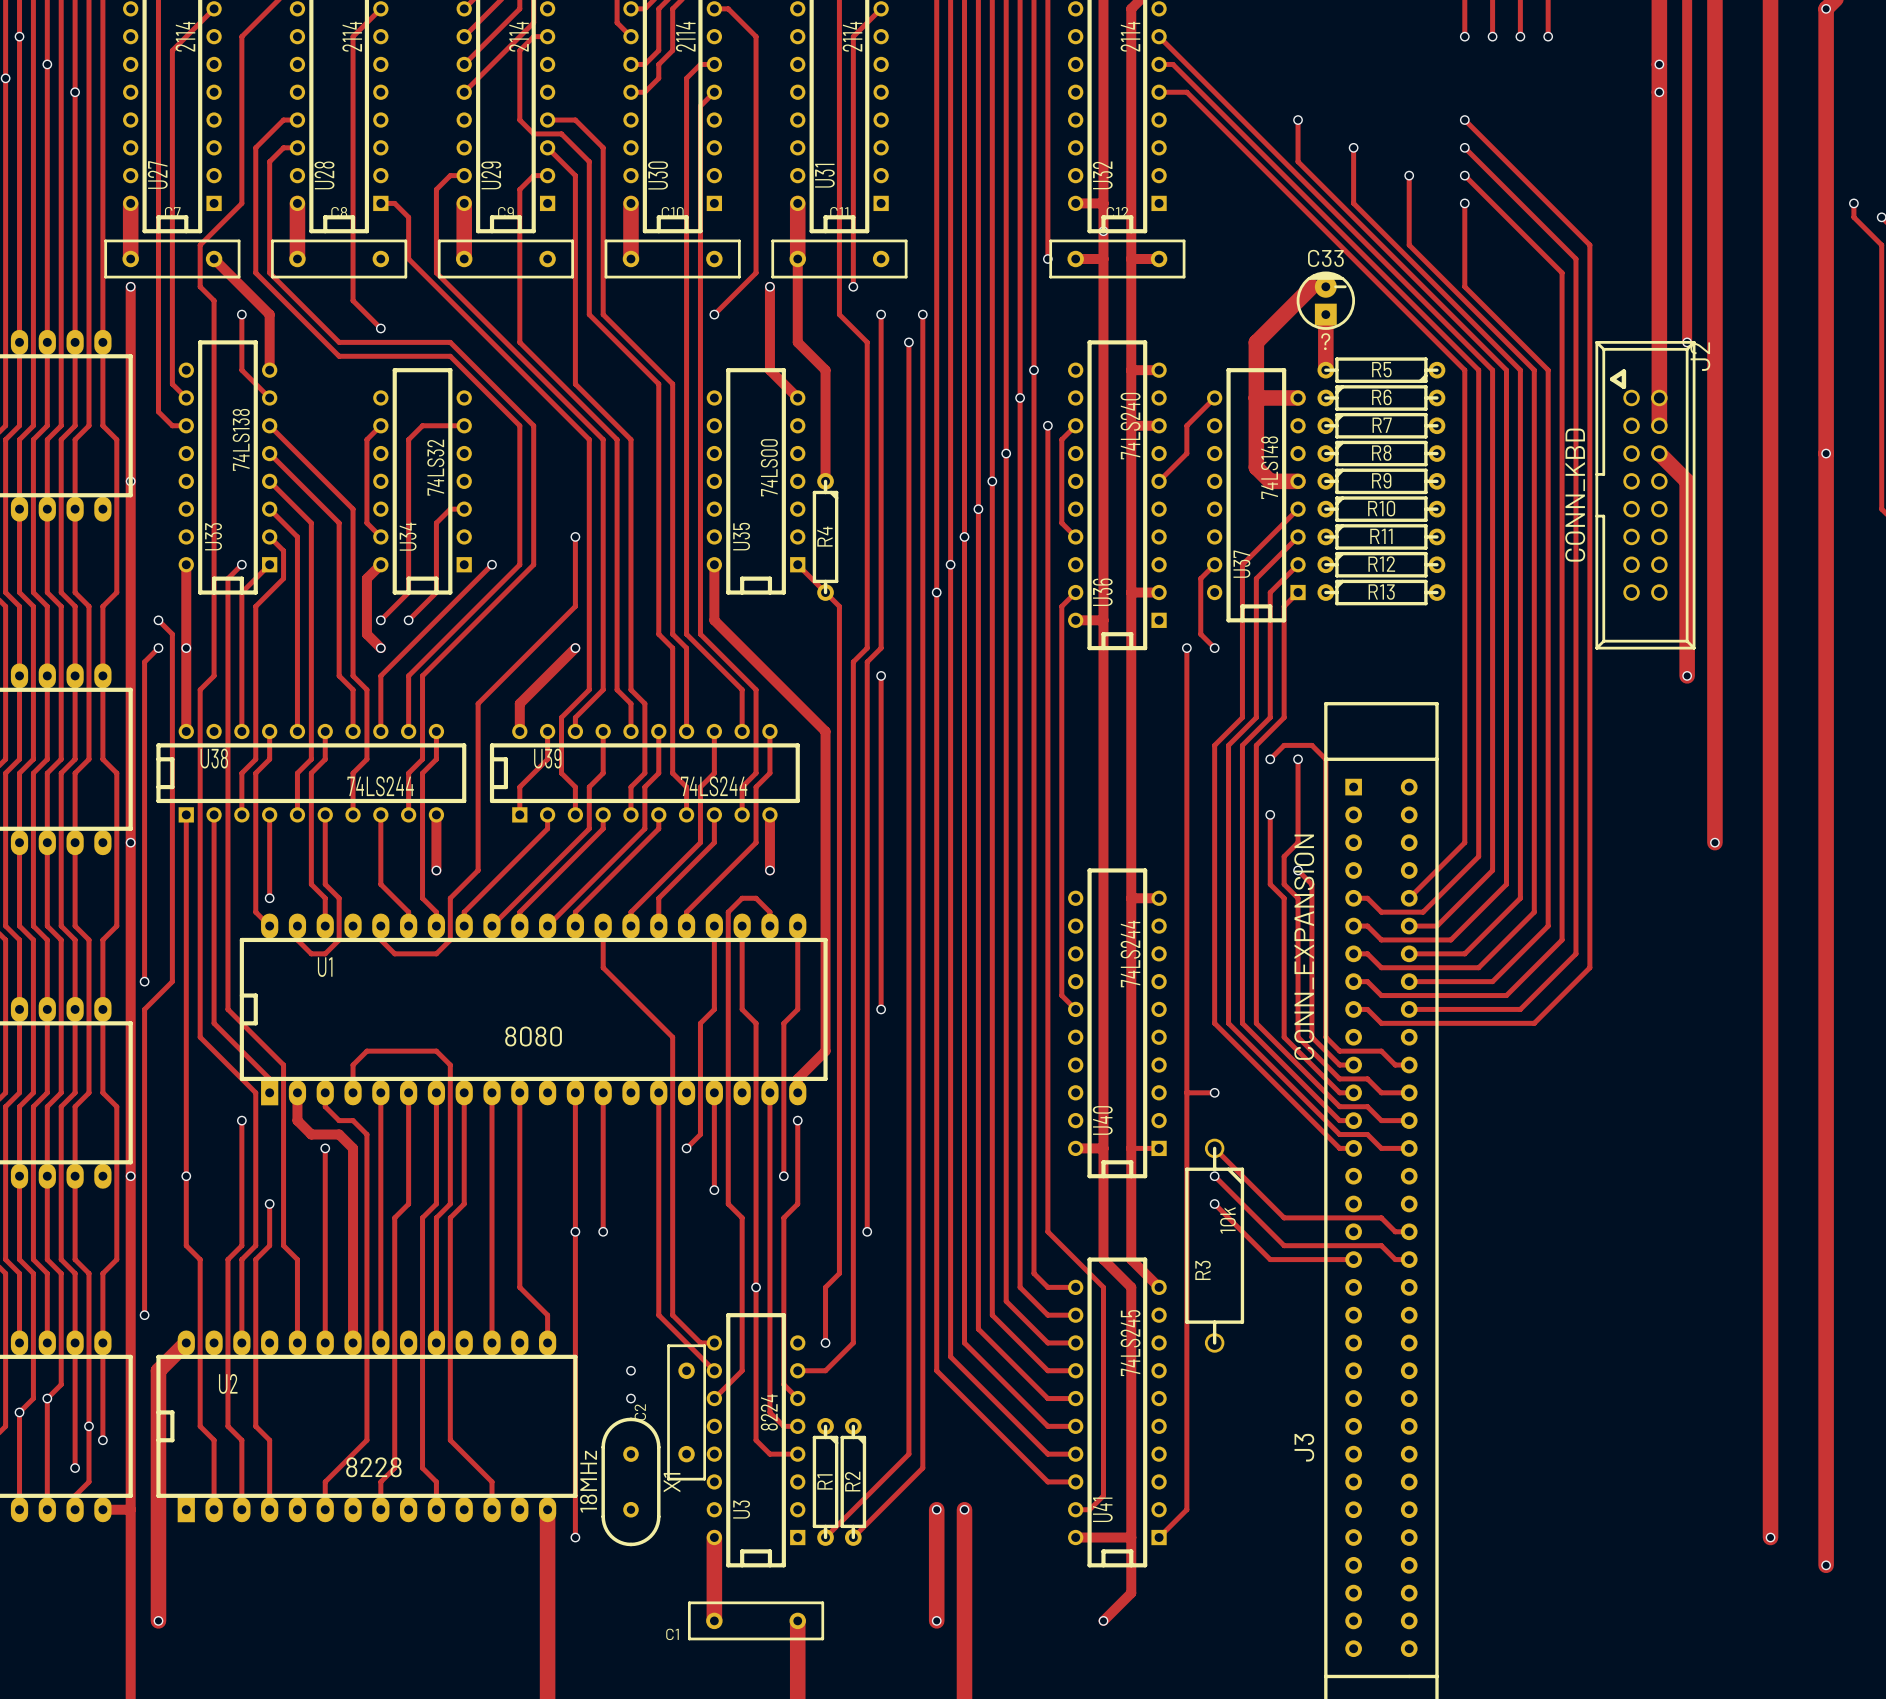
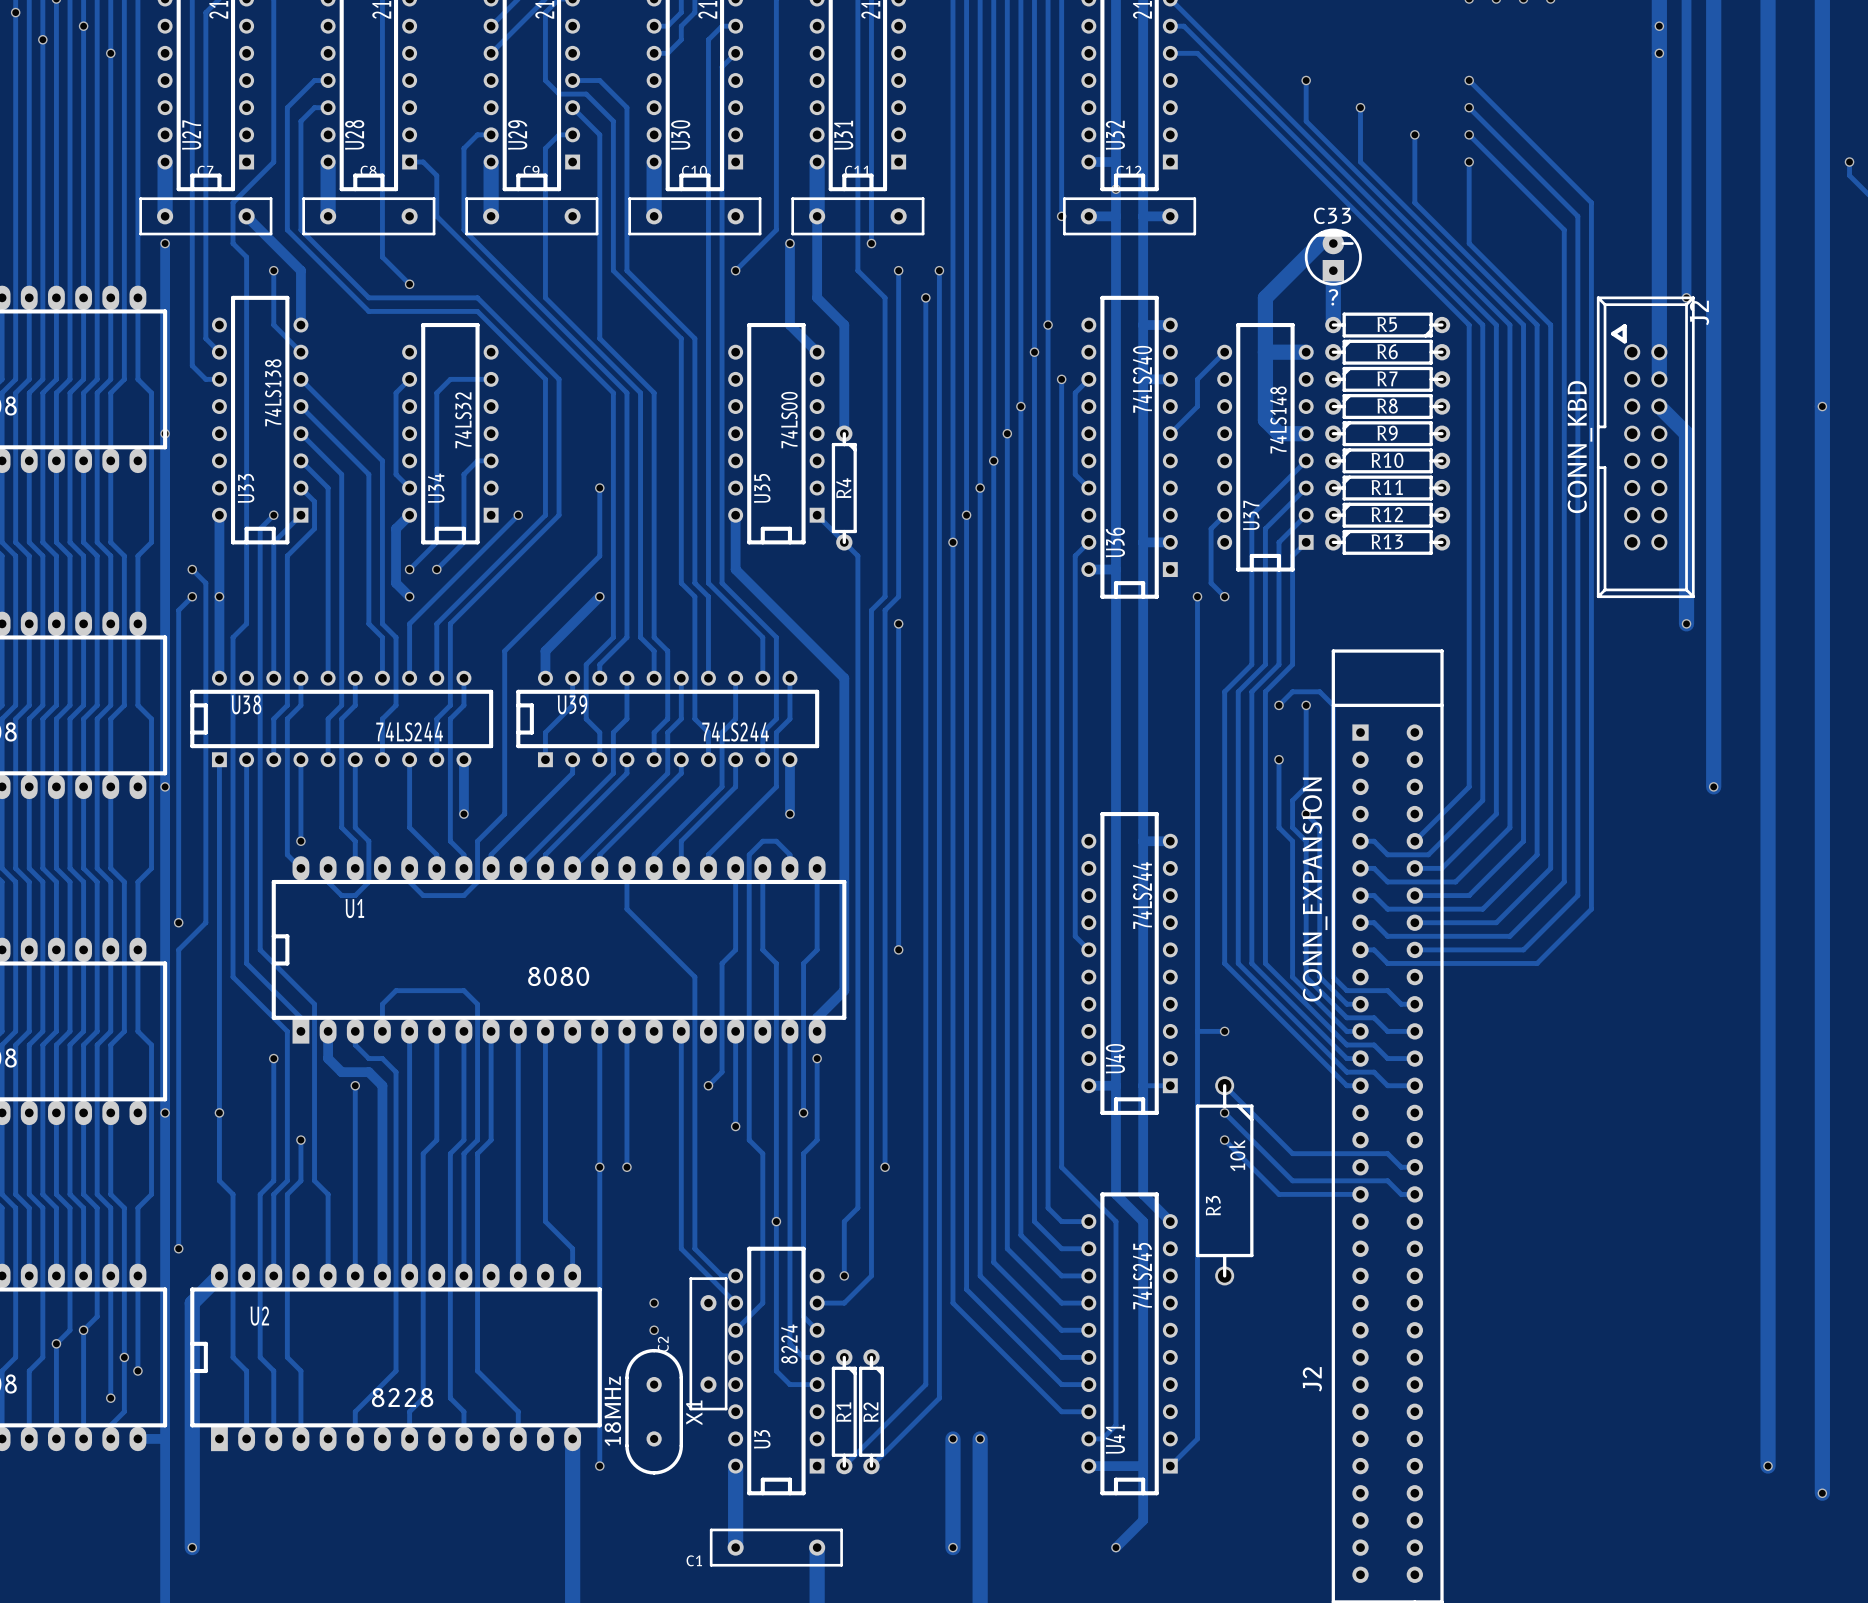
J3 name: J3 (1304, 1447) -> J2 (1312, 1379)

